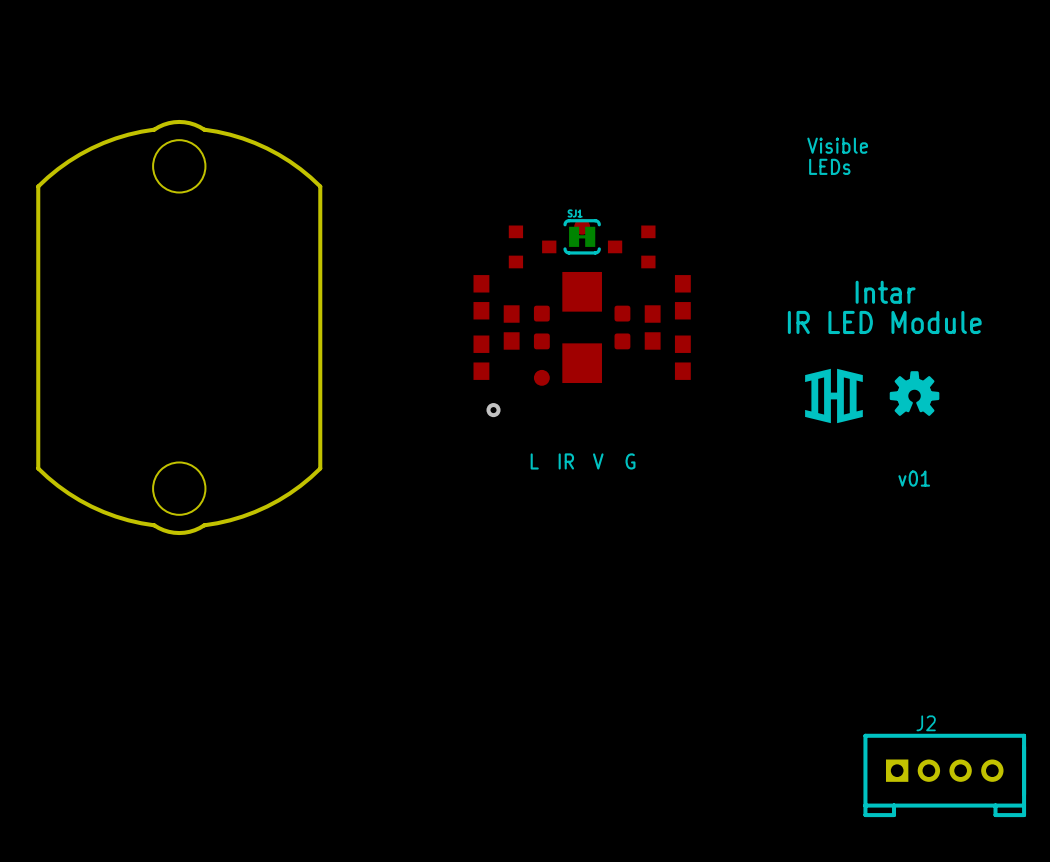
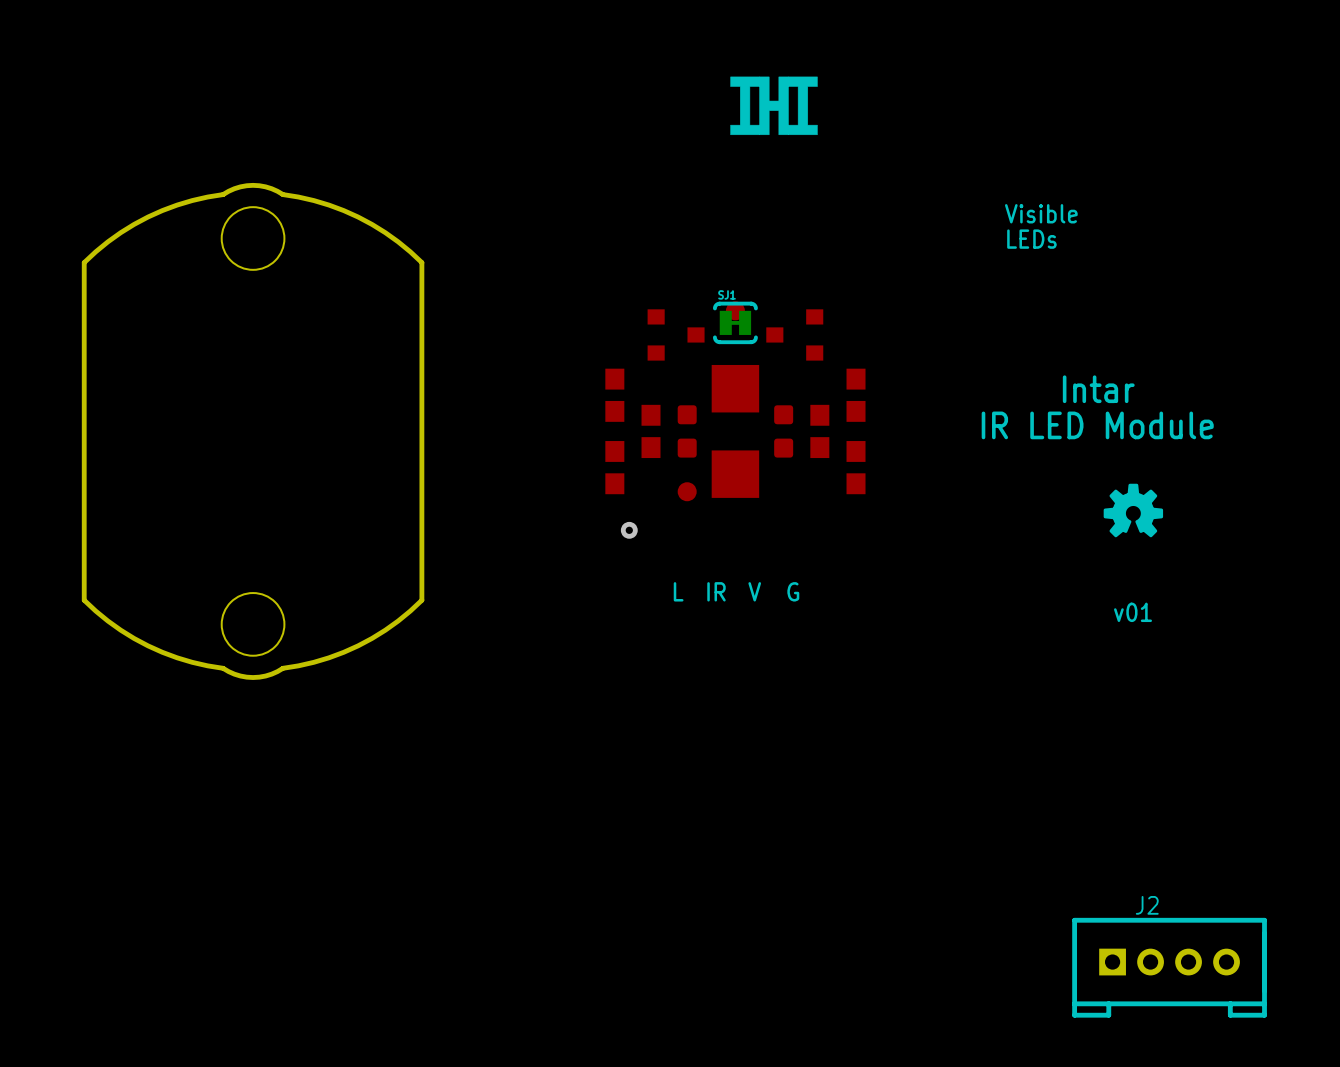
drawing: none -> [730, 76, 818, 136]
drawing: [805, 368, 863, 424] -> none

